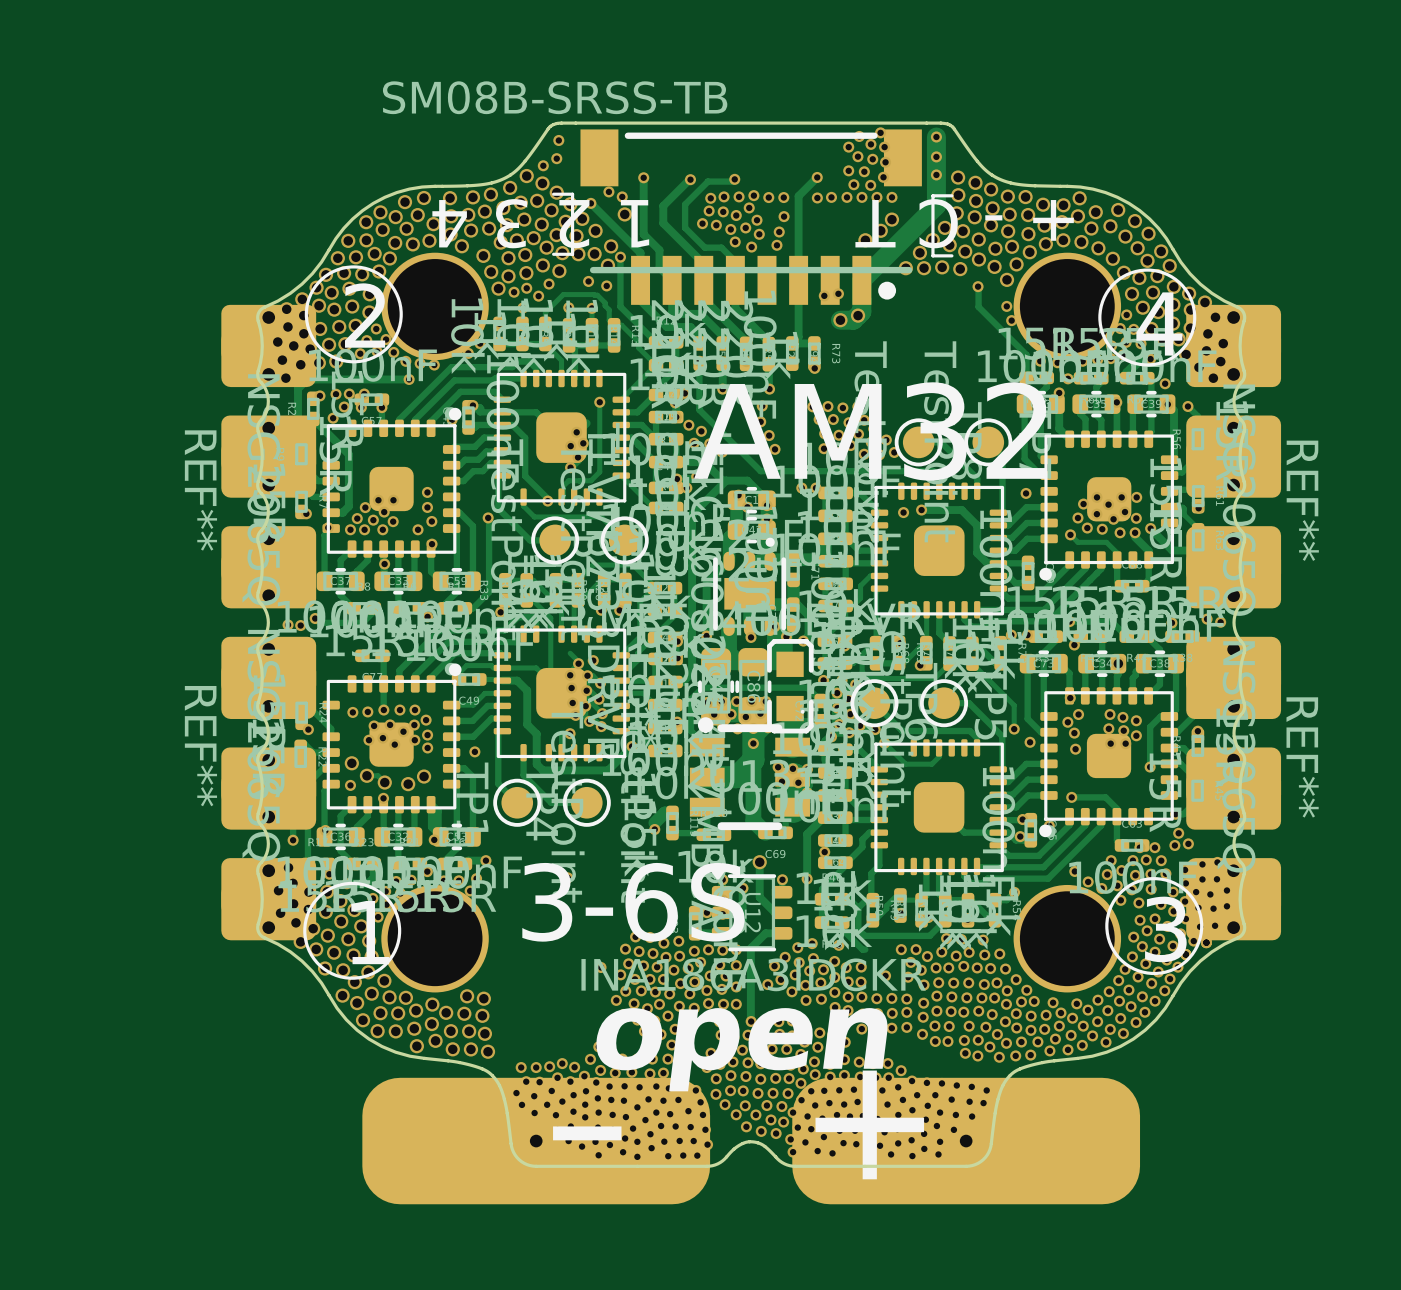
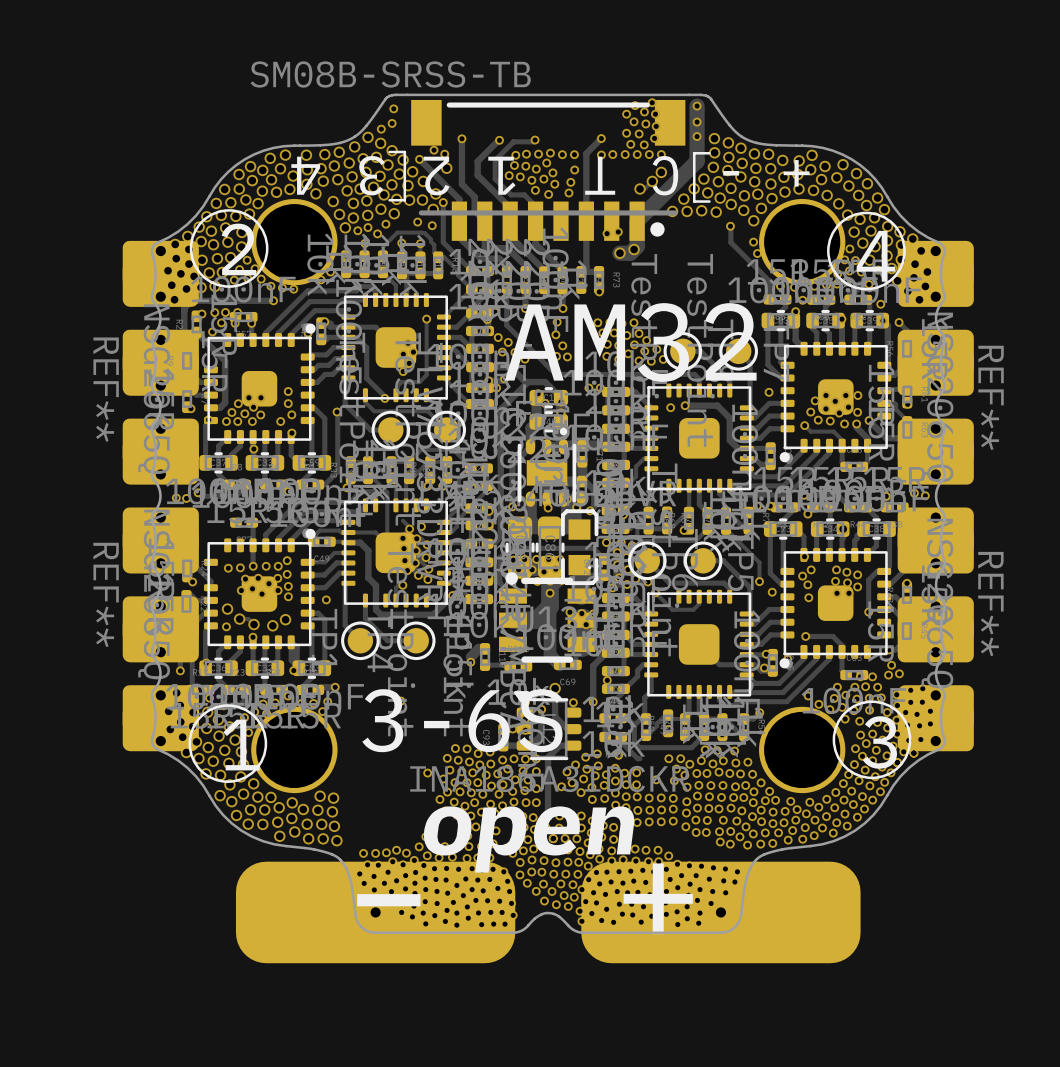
via: none -> (287, 560)

